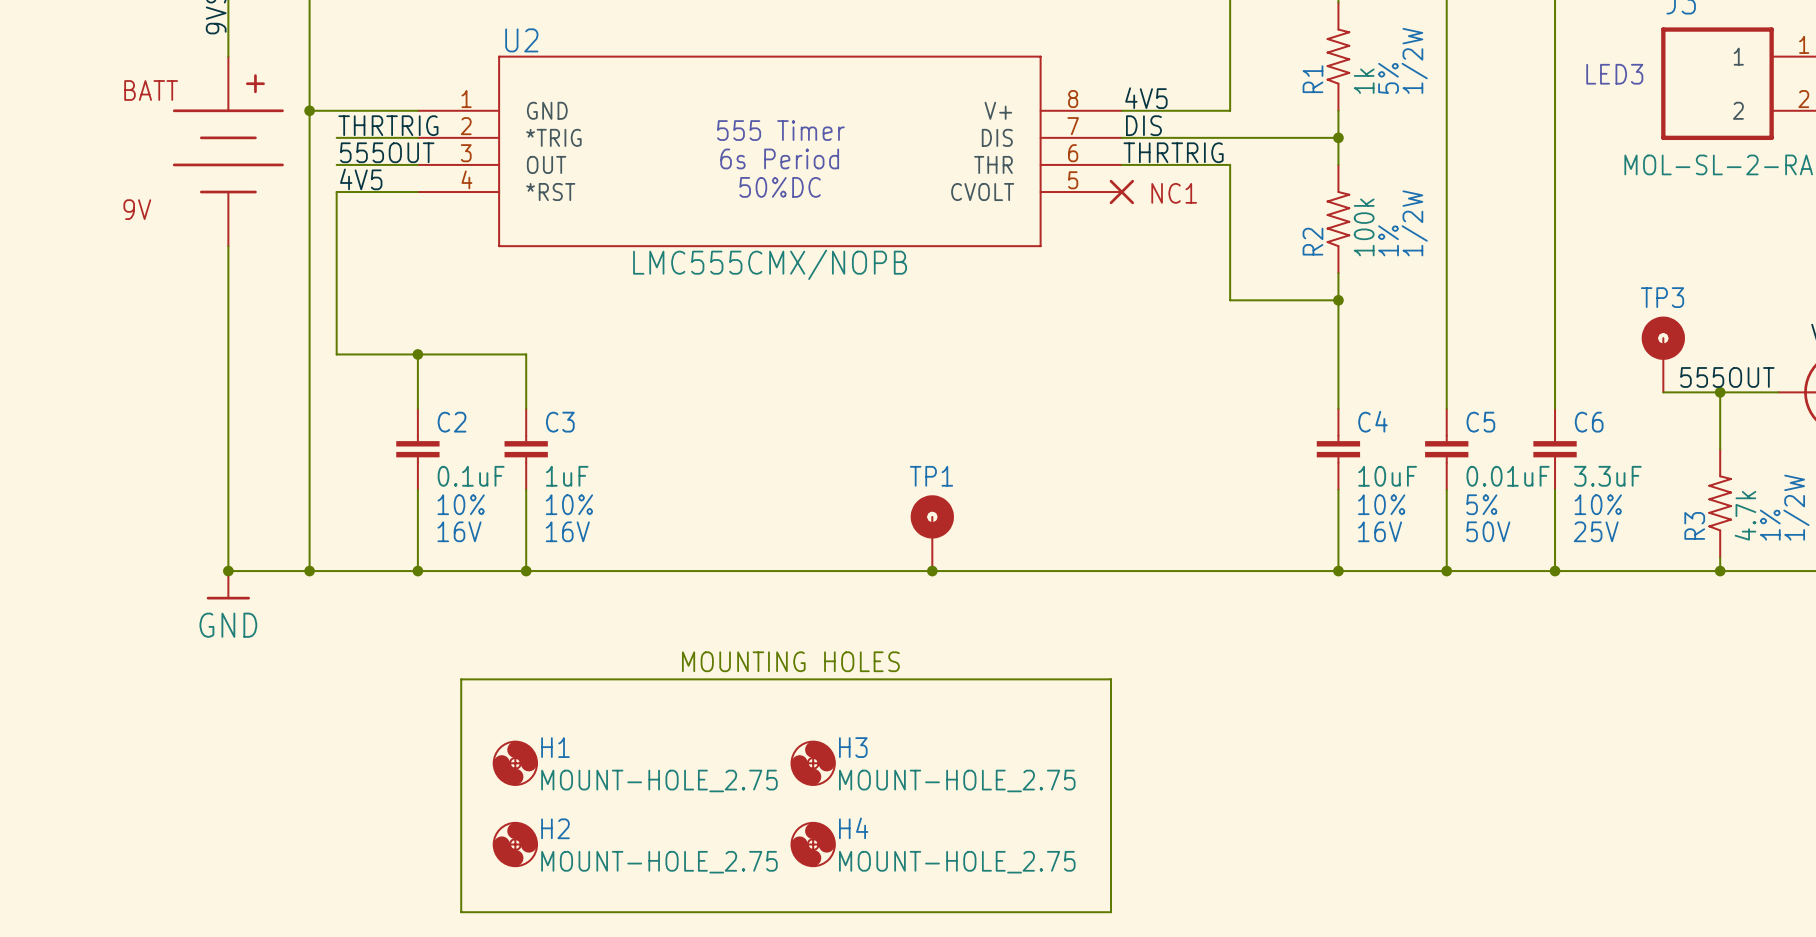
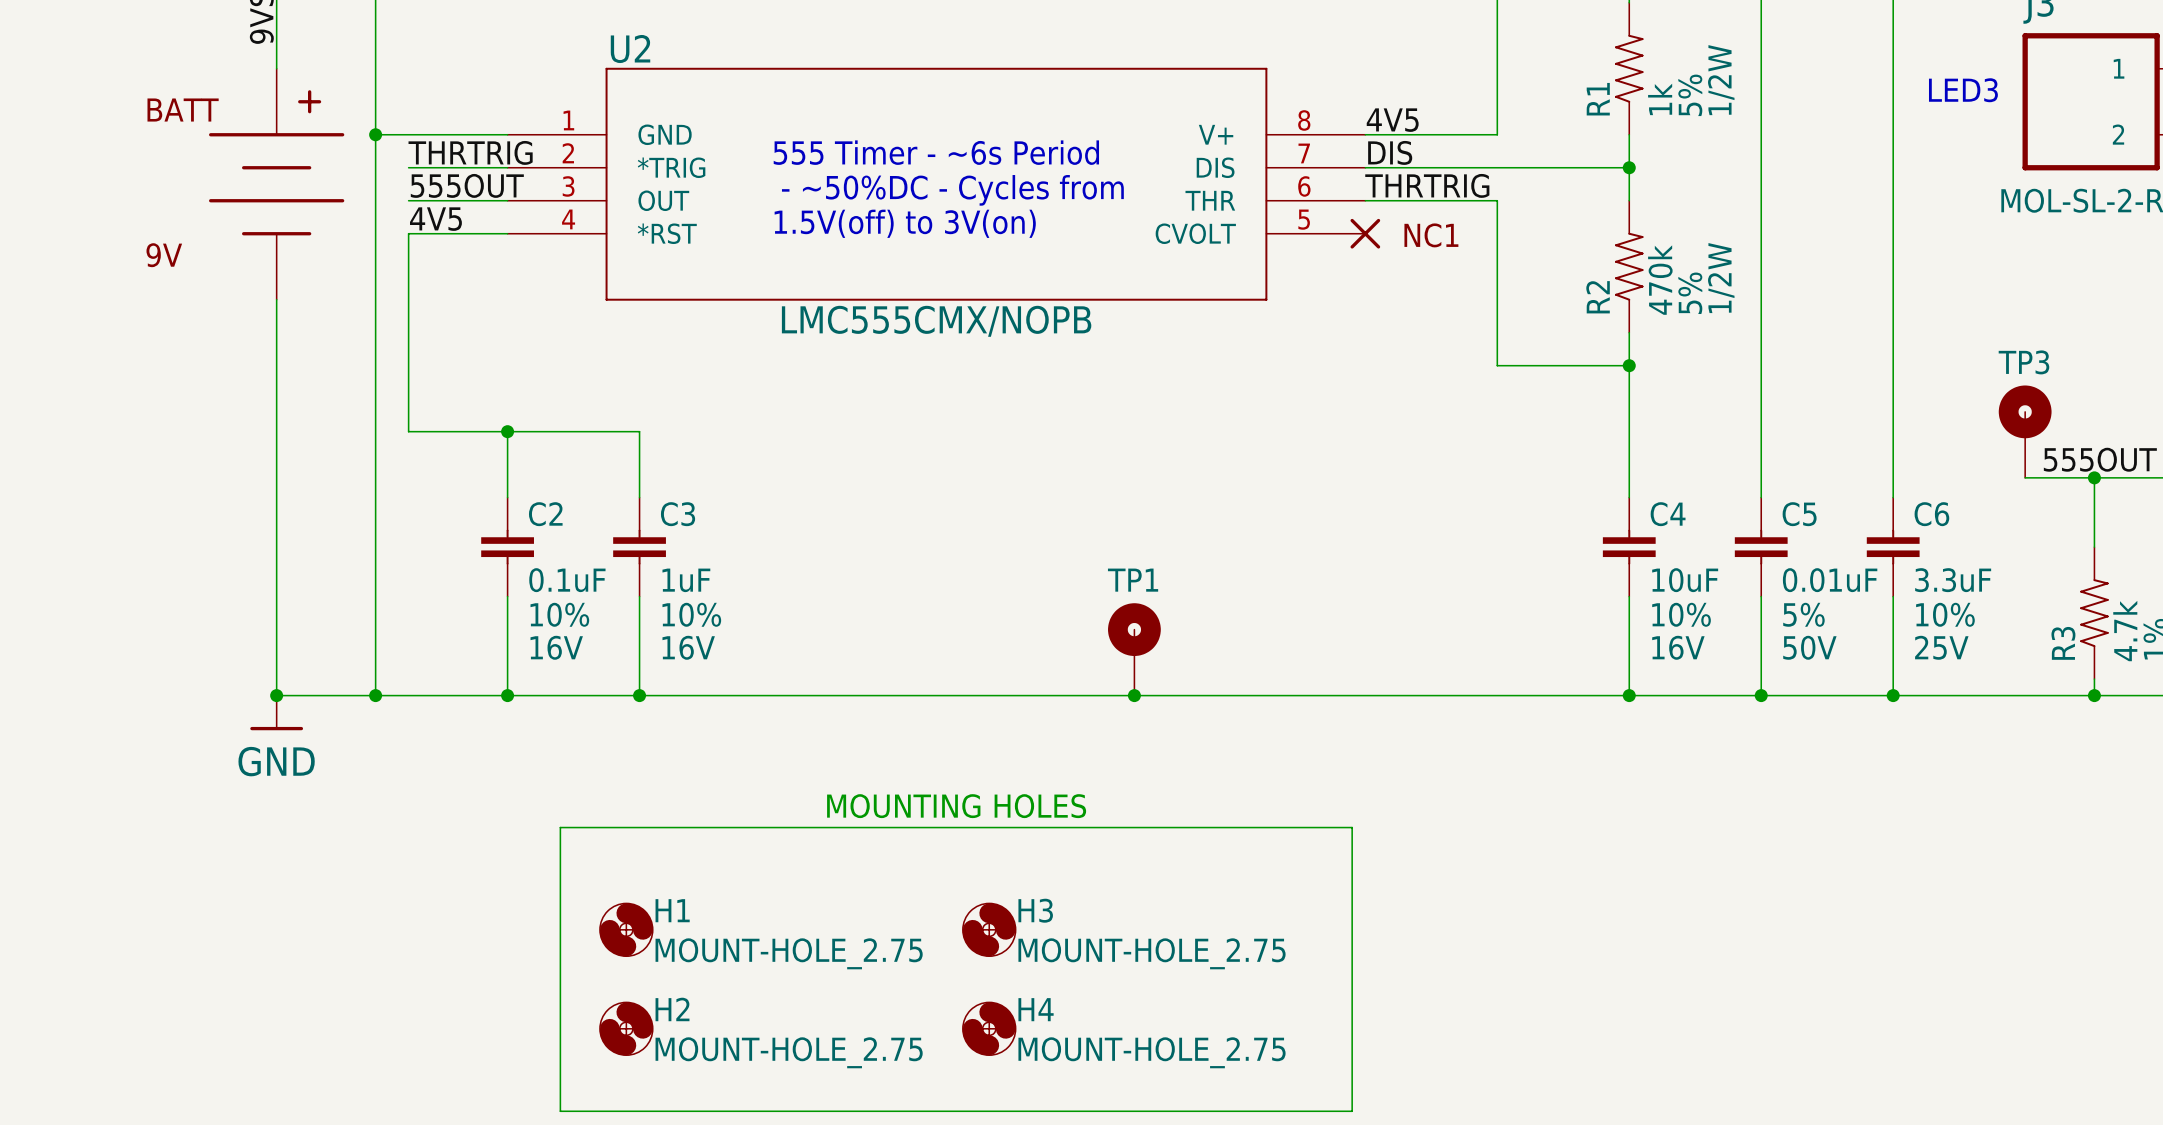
text: none -> 555 Timer - ~6s Period (936, 152)
text: 555 Timer (780, 130) -> none
text: none -> - ~50%DC - Cycles from (952, 190)
text: 6s Period (779, 158) -> none
text: none -> 1.5V(off) to 3V(on) (905, 223)
text: 50%DC (780, 187) -> none
R2 value: 100k (1364, 227) -> 470k (1660, 280)
R2 text: 1% (1388, 240) -> 5% (1690, 293)

